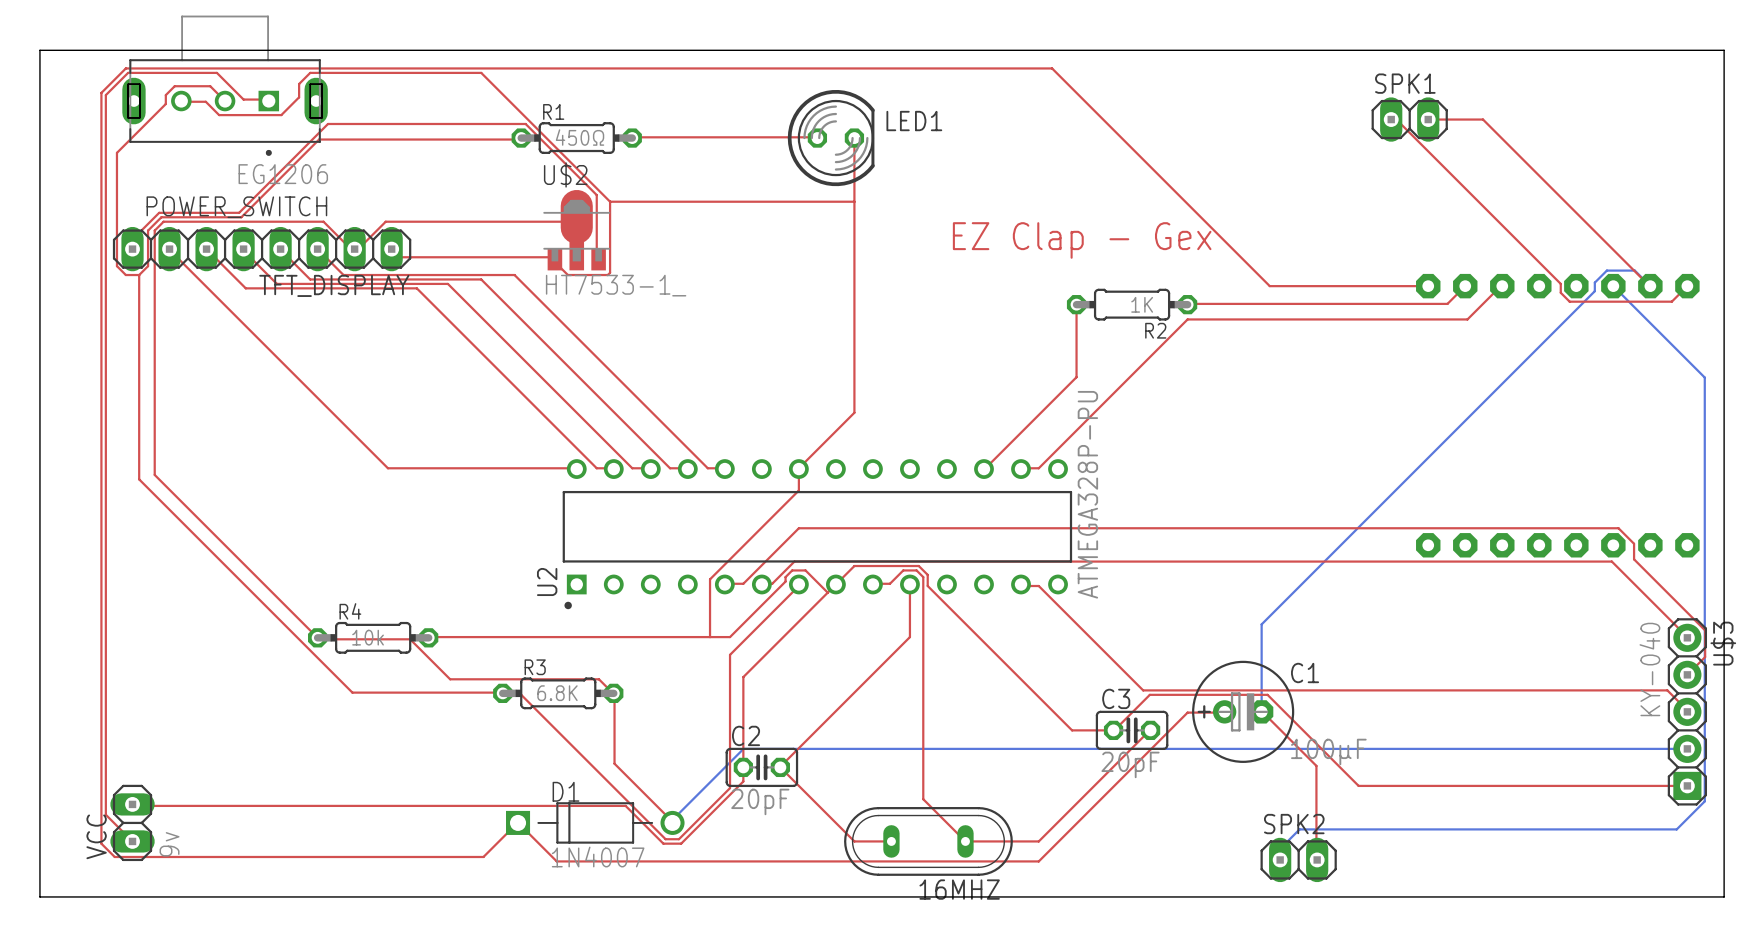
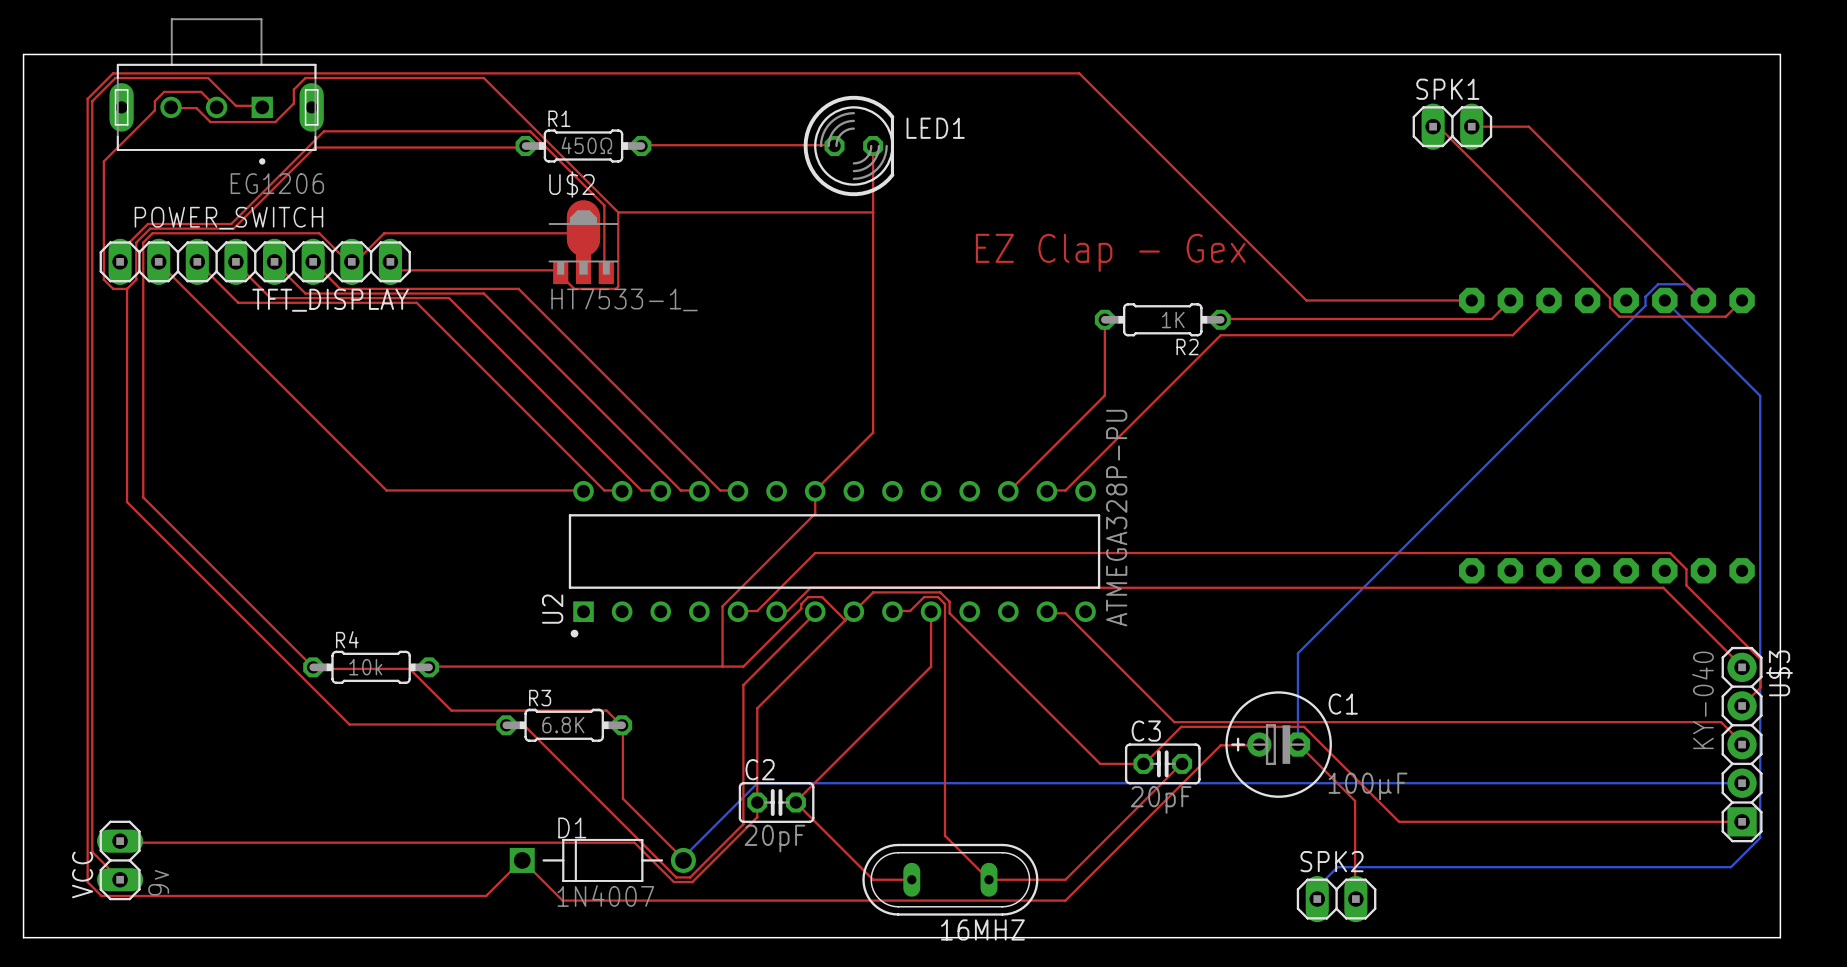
board edge: (128, 84) (128, 117) (139, 117) (139, 84) (128, 84) -> none
board edge: (310, 84) (321, 84) (321, 117) (310, 117) (310, 84) -> none

